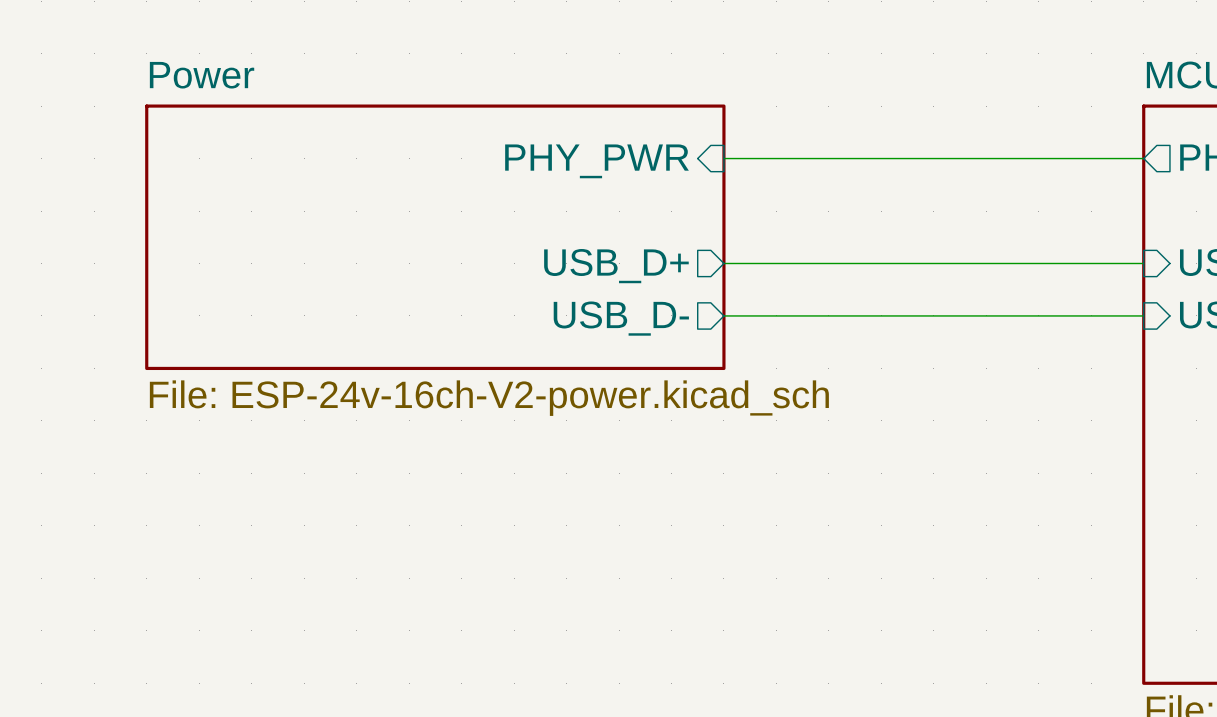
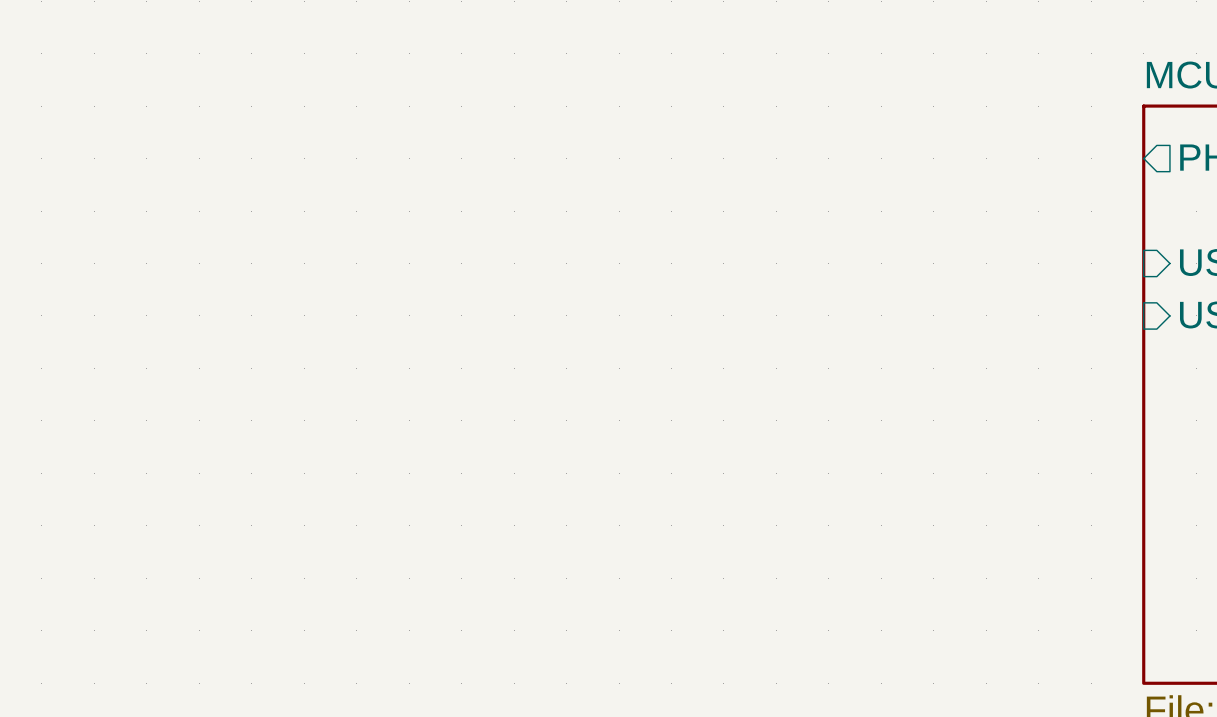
wire: (723, 158) (1143, 158) -> none
sheet pin: PHY_PWR (597, 161) -> none
sheet Power: File: ESP-24v-16ch-V2-power.kicad_sch (435, 237) -> none
wire: (723, 263) (1143, 263) -> none
sheet pin: USB_D+ (616, 266) -> none
wire: (723, 315) (1143, 315) -> none
sheet pin: USB_D- (621, 318) -> none

